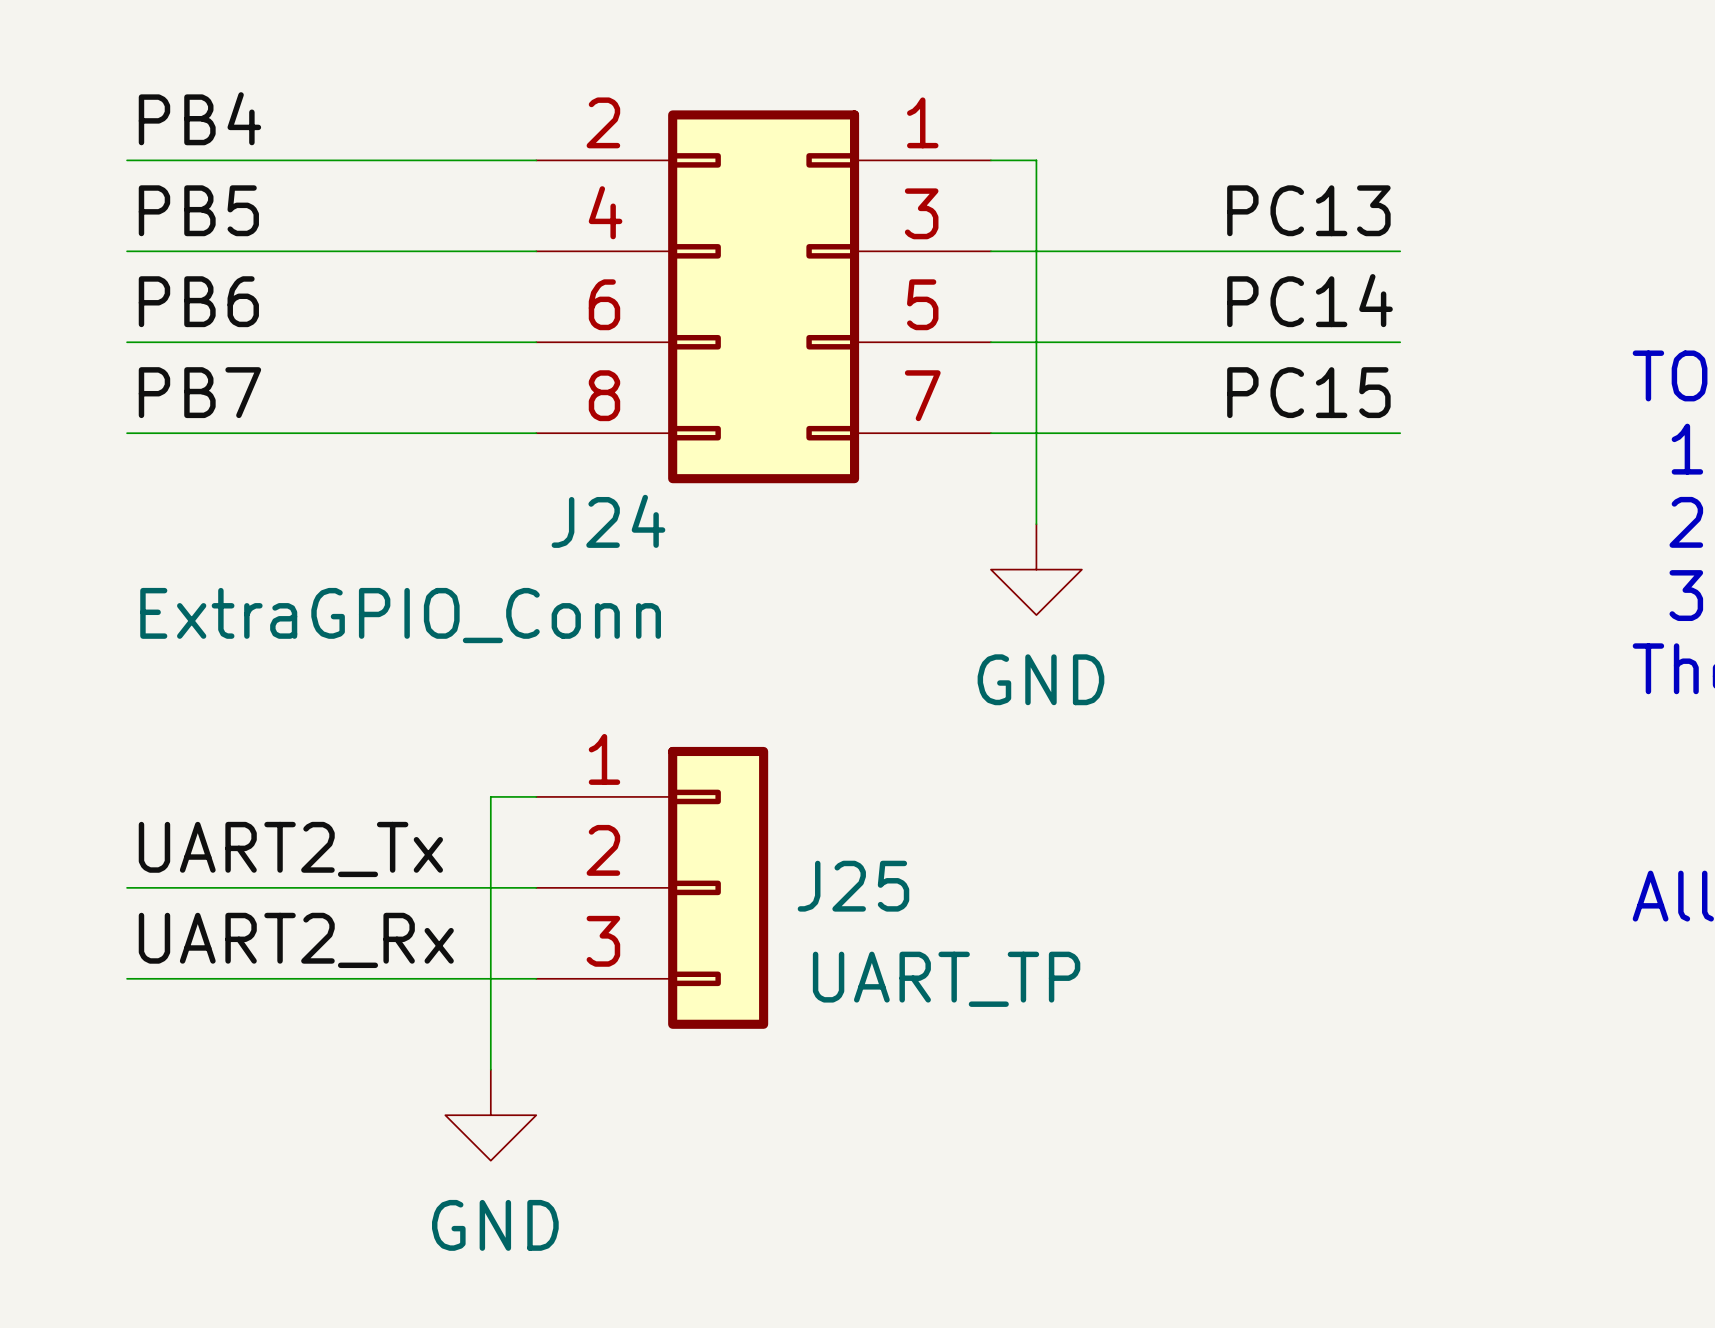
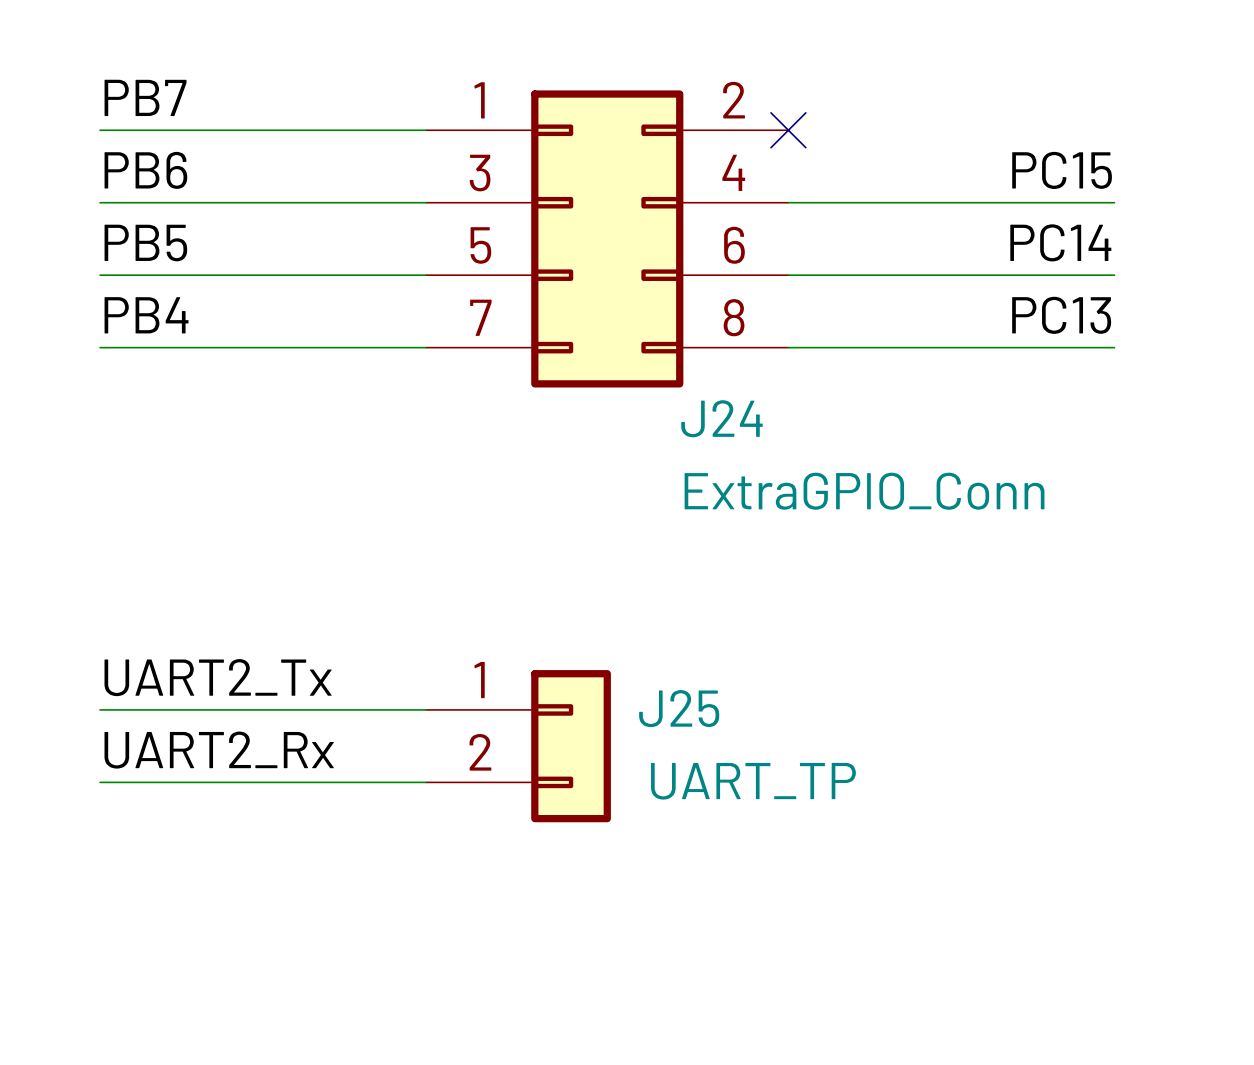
label: PB4 (199, 118) -> PB7 (145, 97)
wire: (990, 160) (1036, 160) (1036, 524) -> none
no-connect mark: none -> (788, 130)
label: PB5 (198, 210) -> PB6 (145, 170)
label: PC13 (1308, 210) -> PC15 (1062, 170)
J24 flip: as is (763, 296) -> left-right (607, 238)
label: PB6 (198, 301) -> PB5 (145, 243)
label: PB7 (199, 392) -> PB4 (146, 315)
label: PC15 (1308, 392) -> PC13 (1061, 315)
power symbol: GND (1036, 569) -> none
J25 symbol: [536, 746, 769, 1029] -> [426, 670, 611, 823]
wire: (536, 796) (490, 796) (490, 1069) -> none
power symbol: GND (490, 1115) -> none

